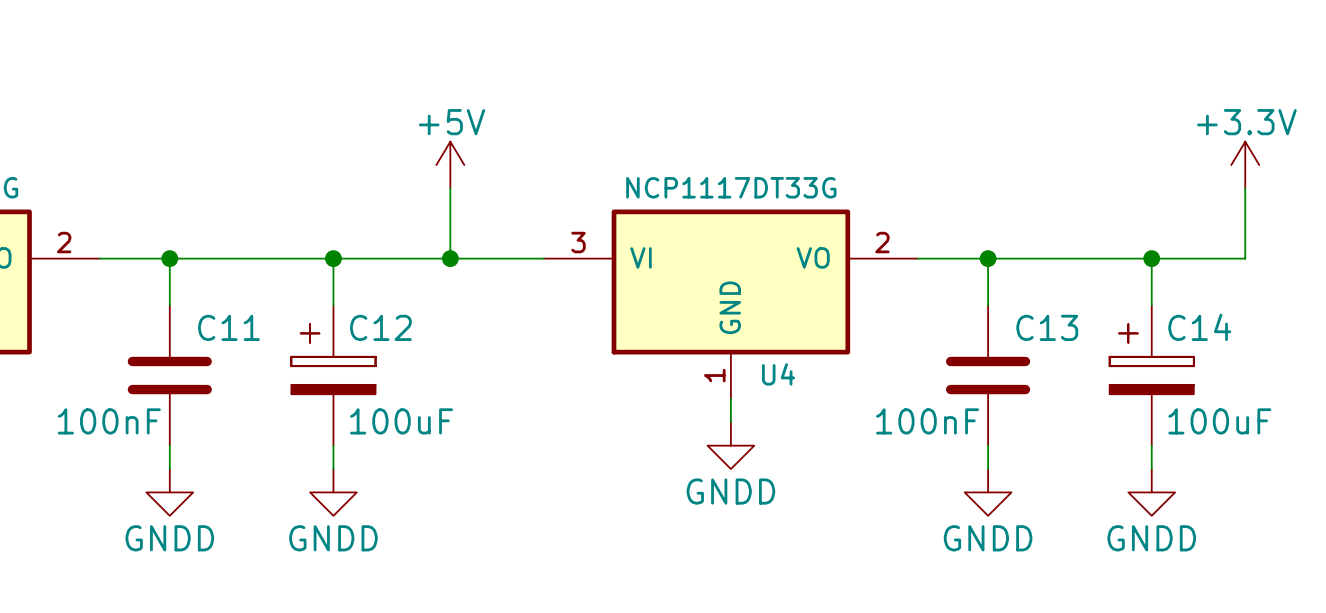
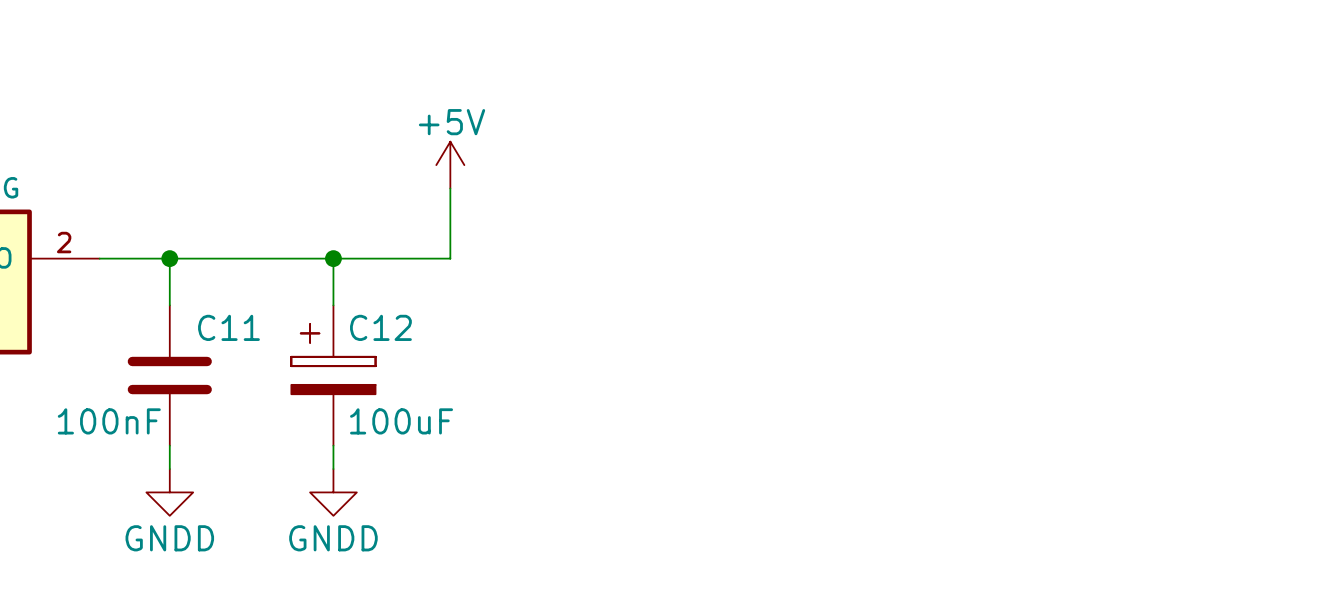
power symbol: +3.3V (1245, 165) -> none
wire: (1245, 188) (1245, 258) (917, 258) -> none
wire: (450, 258) (543, 258) -> none
junction: (450, 258) -> none
wire: (988, 258) (988, 305) -> none
junction: (988, 258) -> none
wire: (1151, 258) (1151, 305) -> none
junction: (1151, 258) -> none
U4: NCP1117DT33G (730, 304) -> none
C13: 100nF (988, 375) -> none
C14: 100uF (1151, 375) -> none
wire: (730, 398) (730, 422) -> none
power symbol: GNDD (730, 445) -> none
wire: (988, 445) (988, 469) -> none
wire: (1151, 445) (1151, 469) -> none
power symbol: GNDD (988, 492) -> none
power symbol: GNDD (1151, 492) -> none

